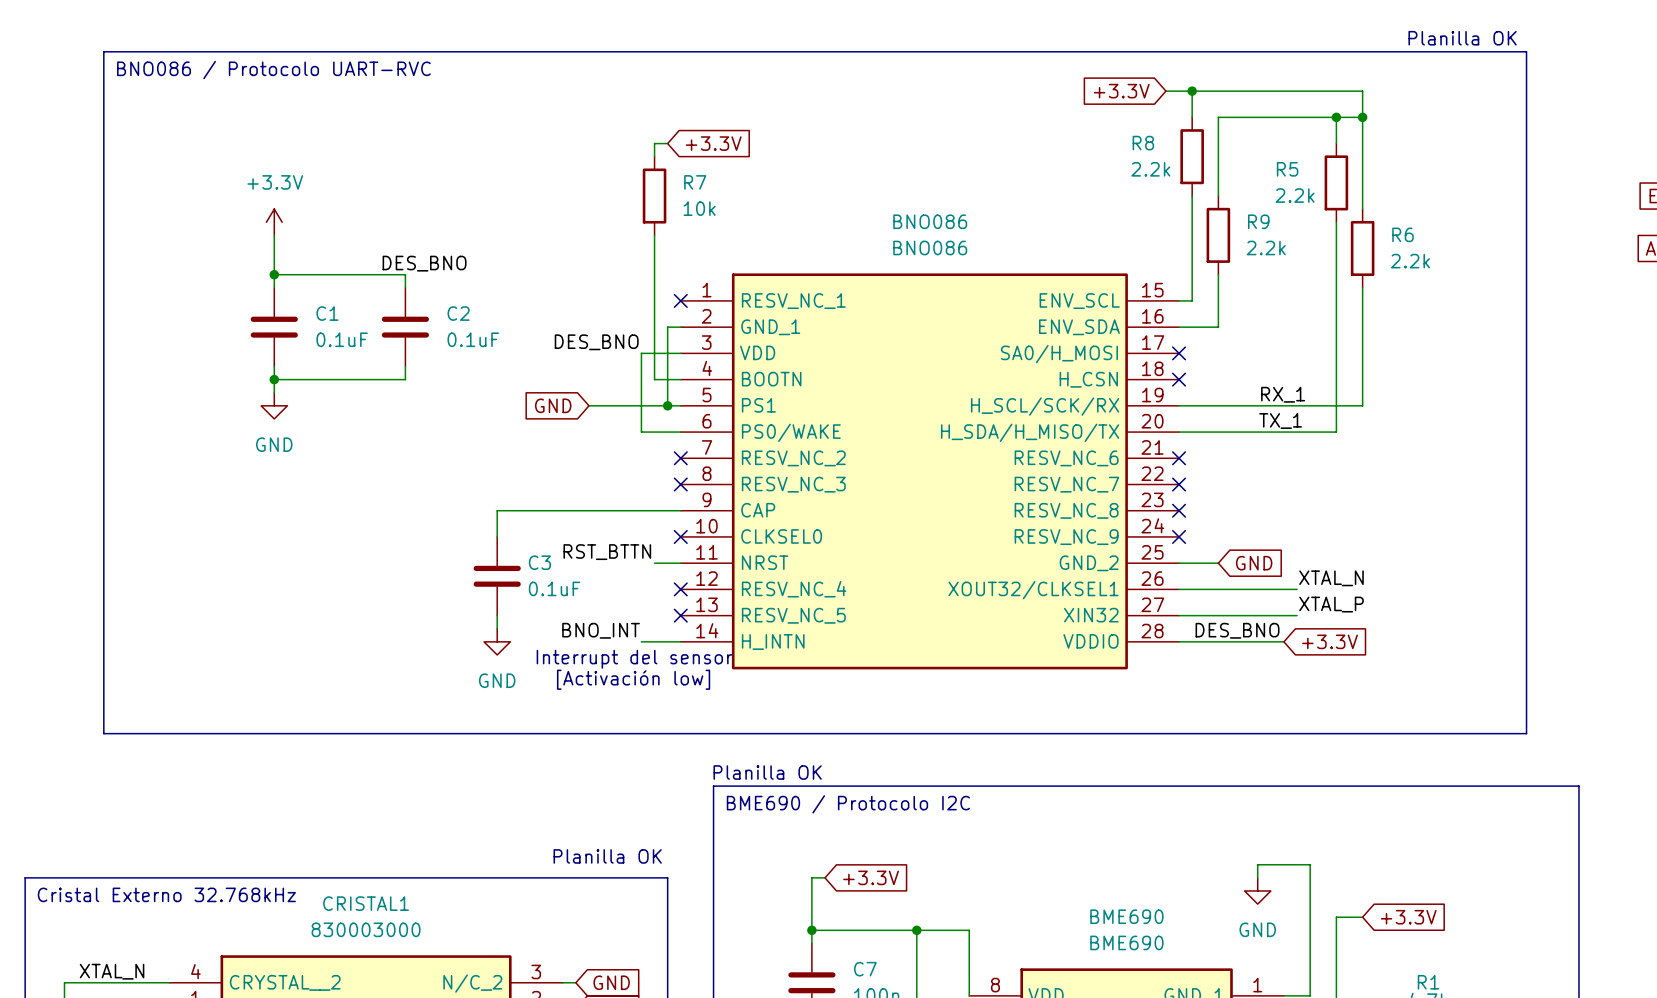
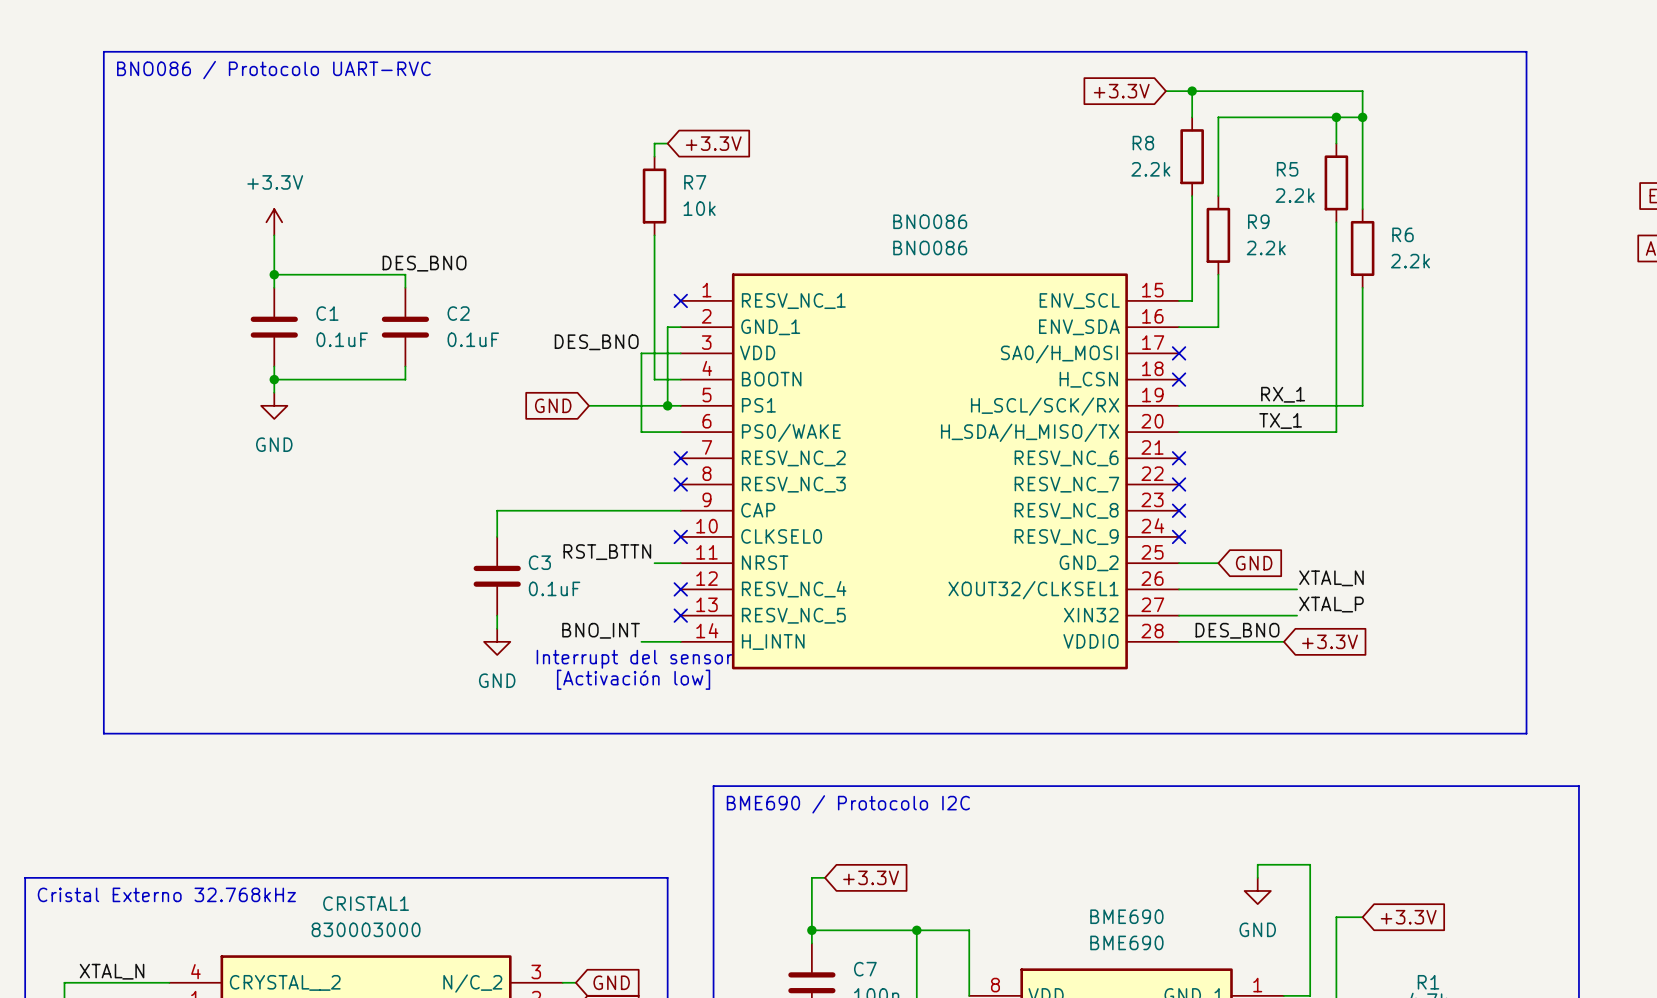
text: Planilla OK (1462, 38) -> none
text: Planilla OK (767, 772) -> none
text: Planilla OK (607, 856) -> none

